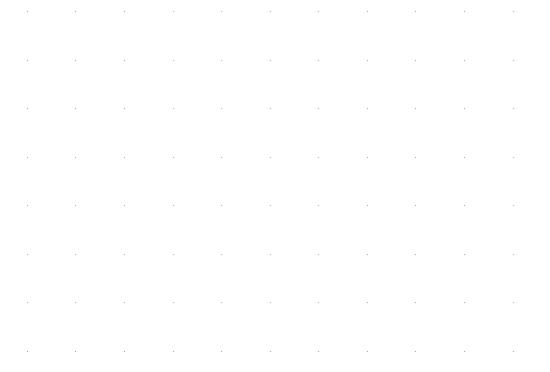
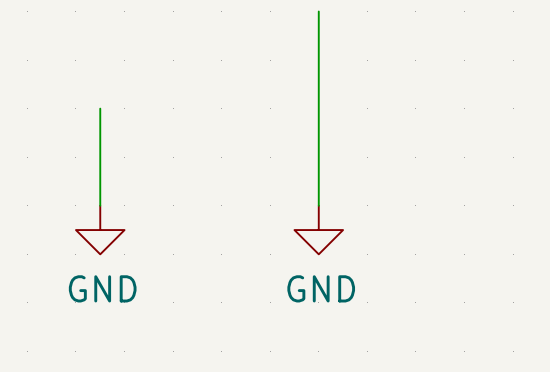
wire: none -> (318, 11) (318, 205)
wire: none -> (100, 108) (100, 205)
power symbol: none -> GND (100, 230)
power symbol: none -> GND (318, 230)

